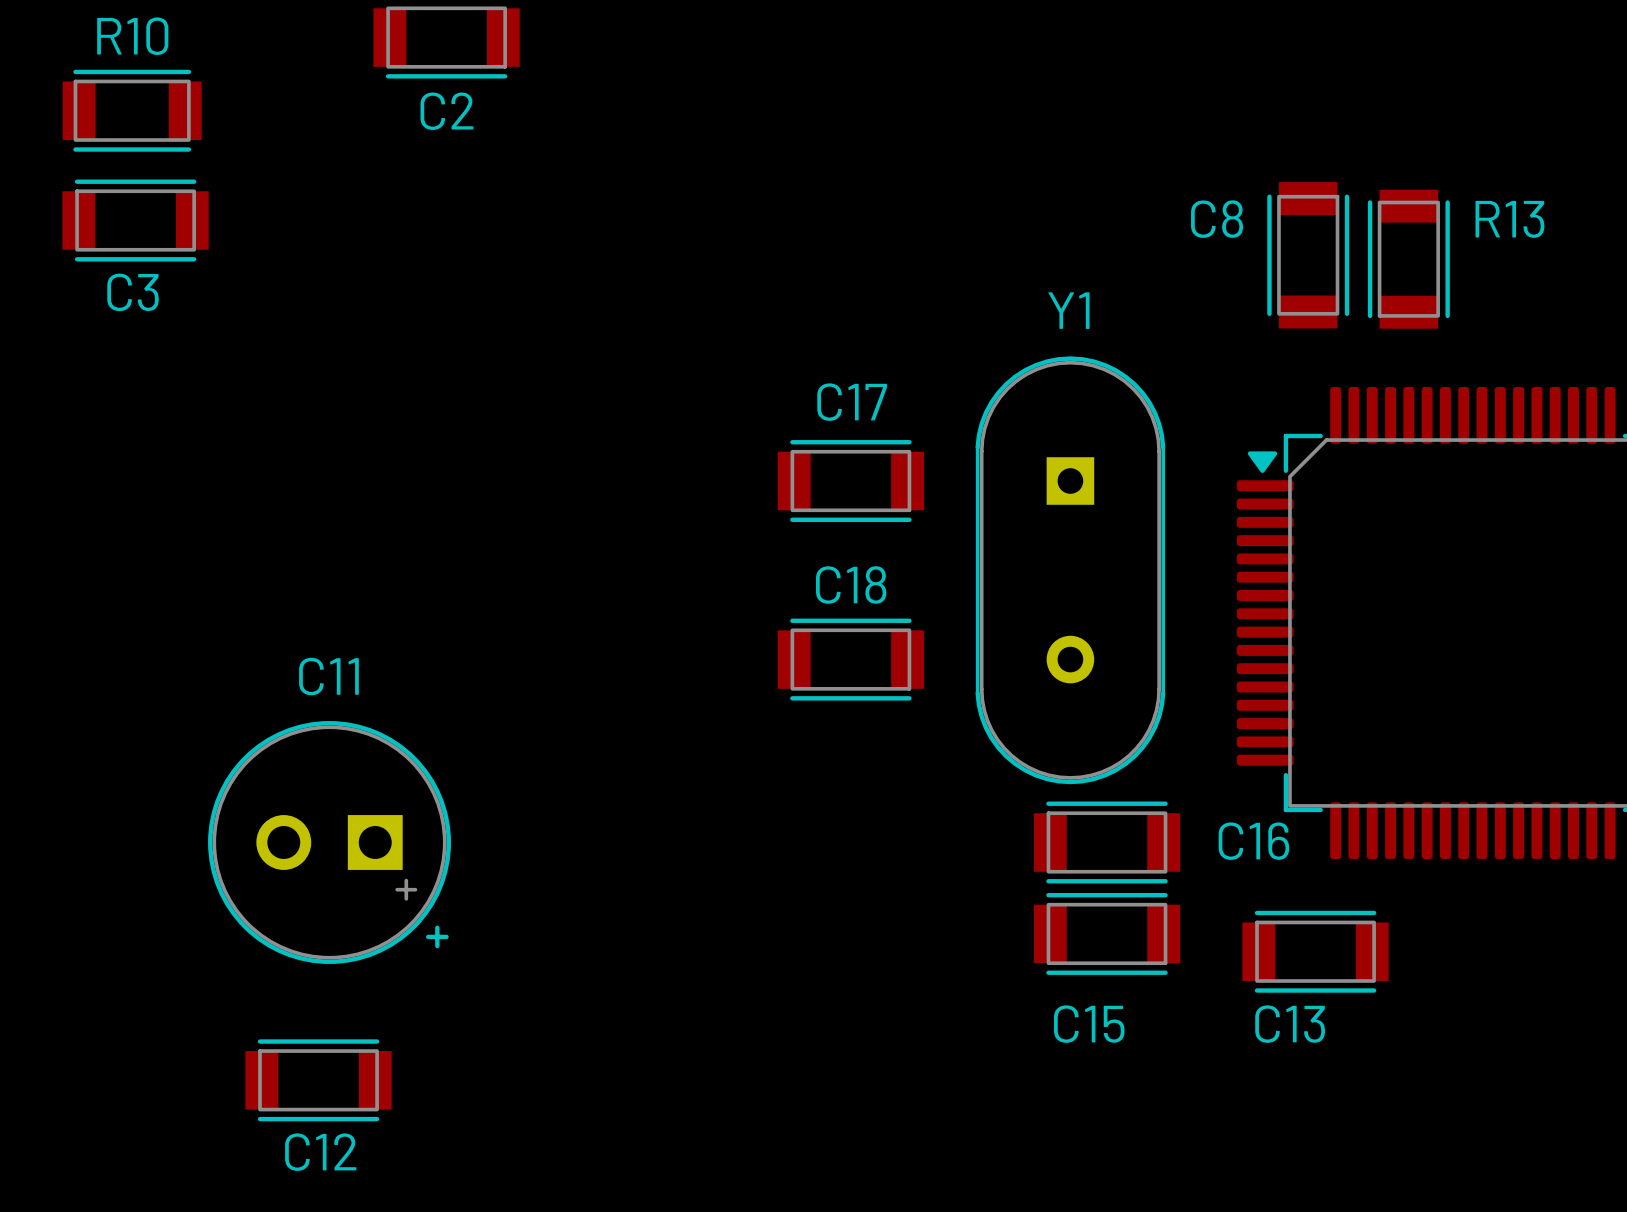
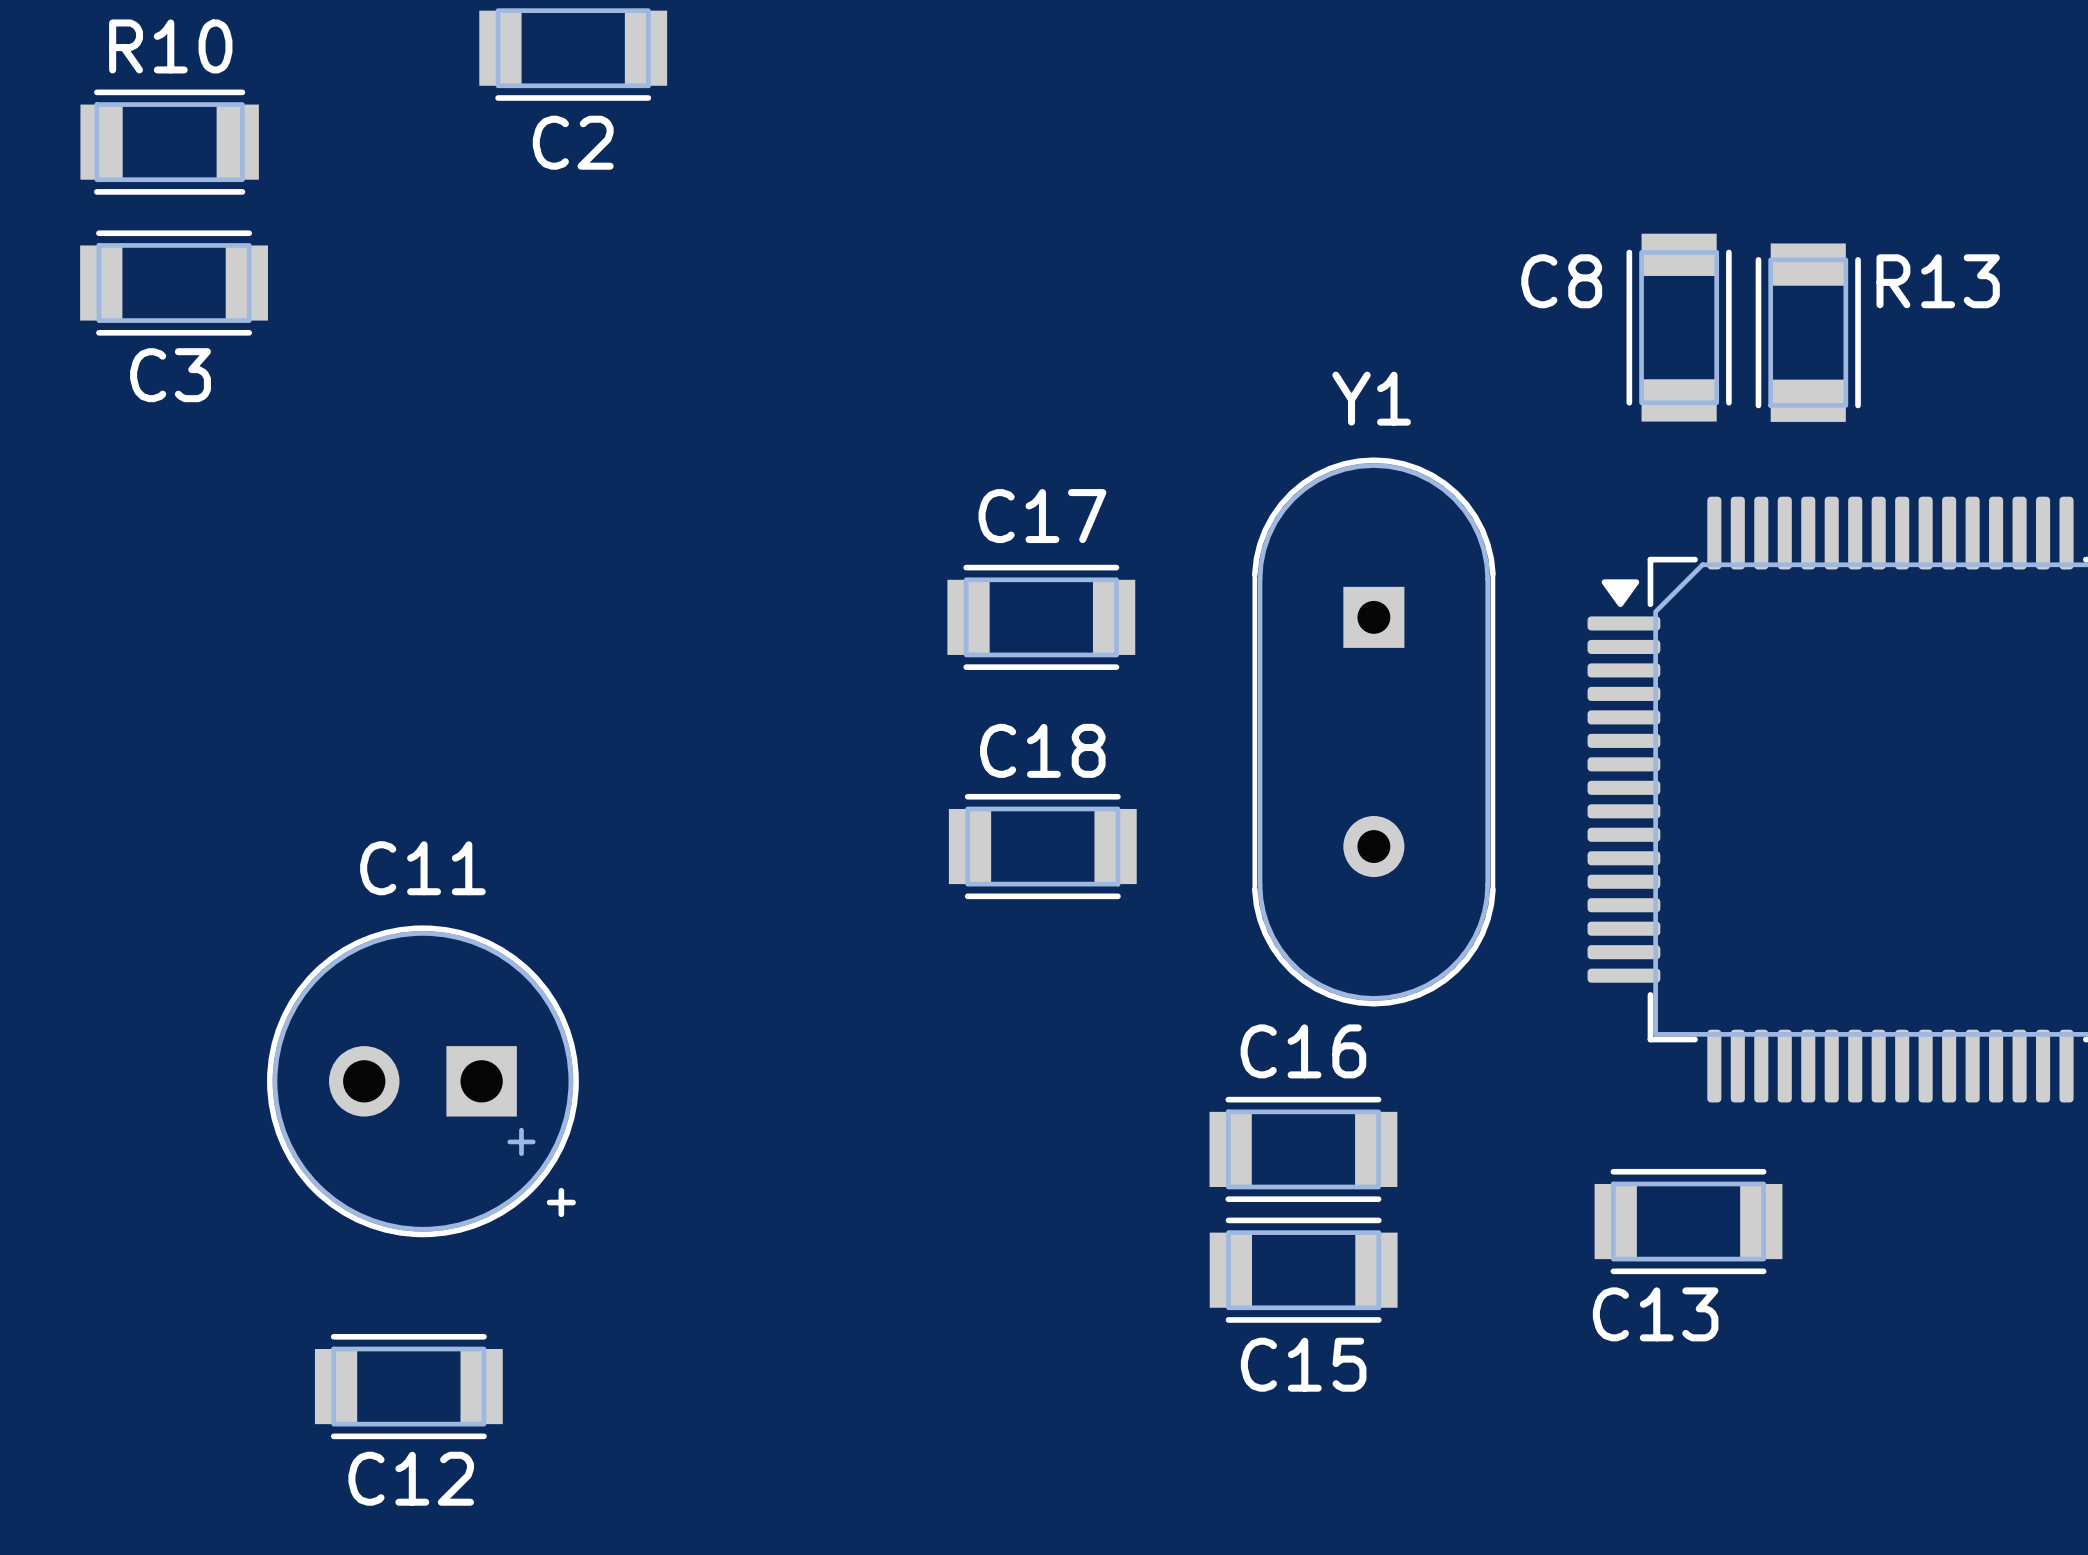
C17 position: (850, 481) -> (1041, 617)
C18 position: (850, 659) -> (1042, 846)
C16 name position: C16 (1253, 841) -> C16 (1303, 1051)
C16 position: (1107, 842) -> (1303, 1149)
C15 position: (1107, 933) -> (1303, 1270)
C15 name position: C15 (1089, 1024) -> C15 (1303, 1364)

